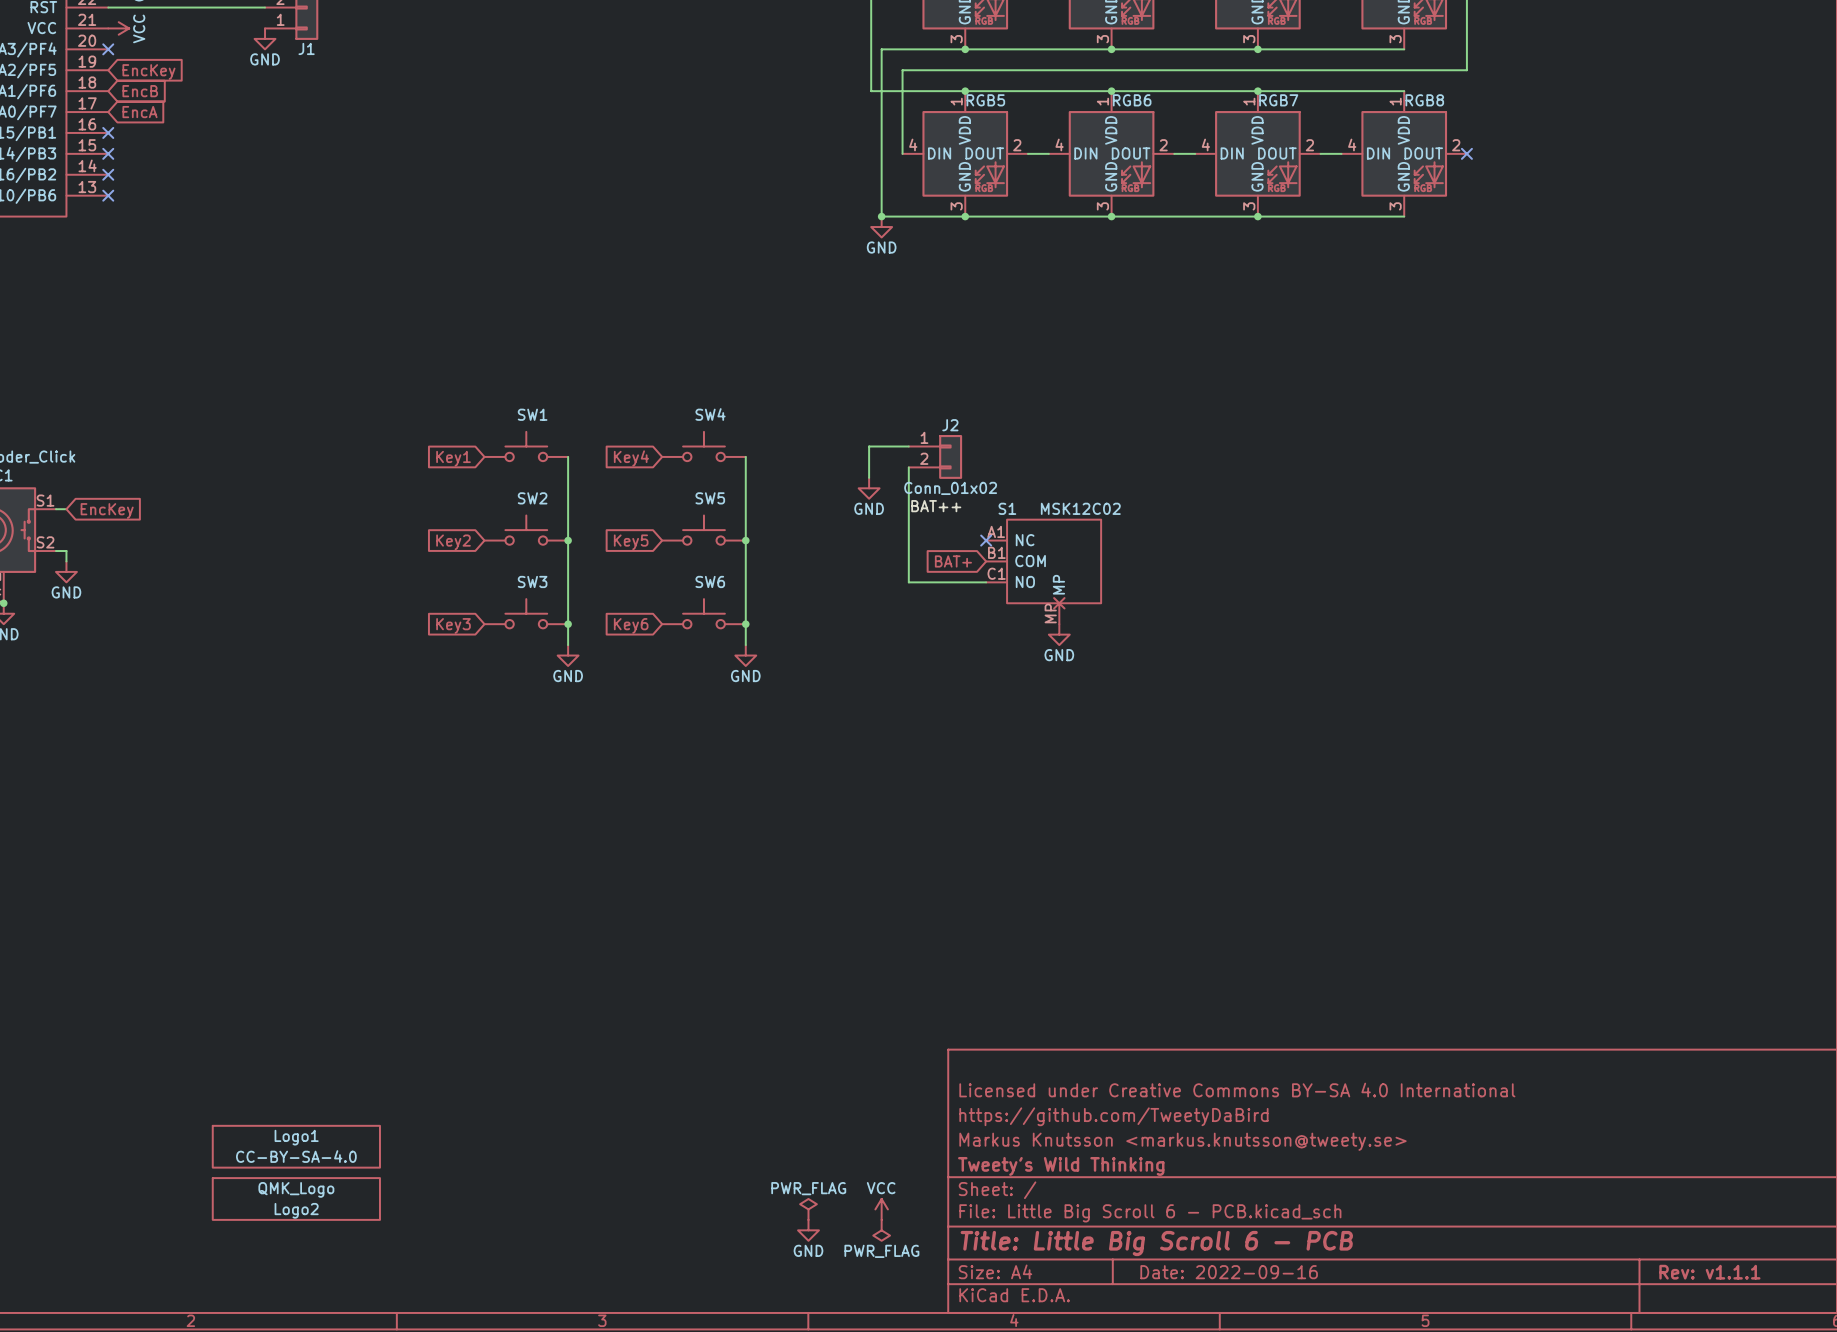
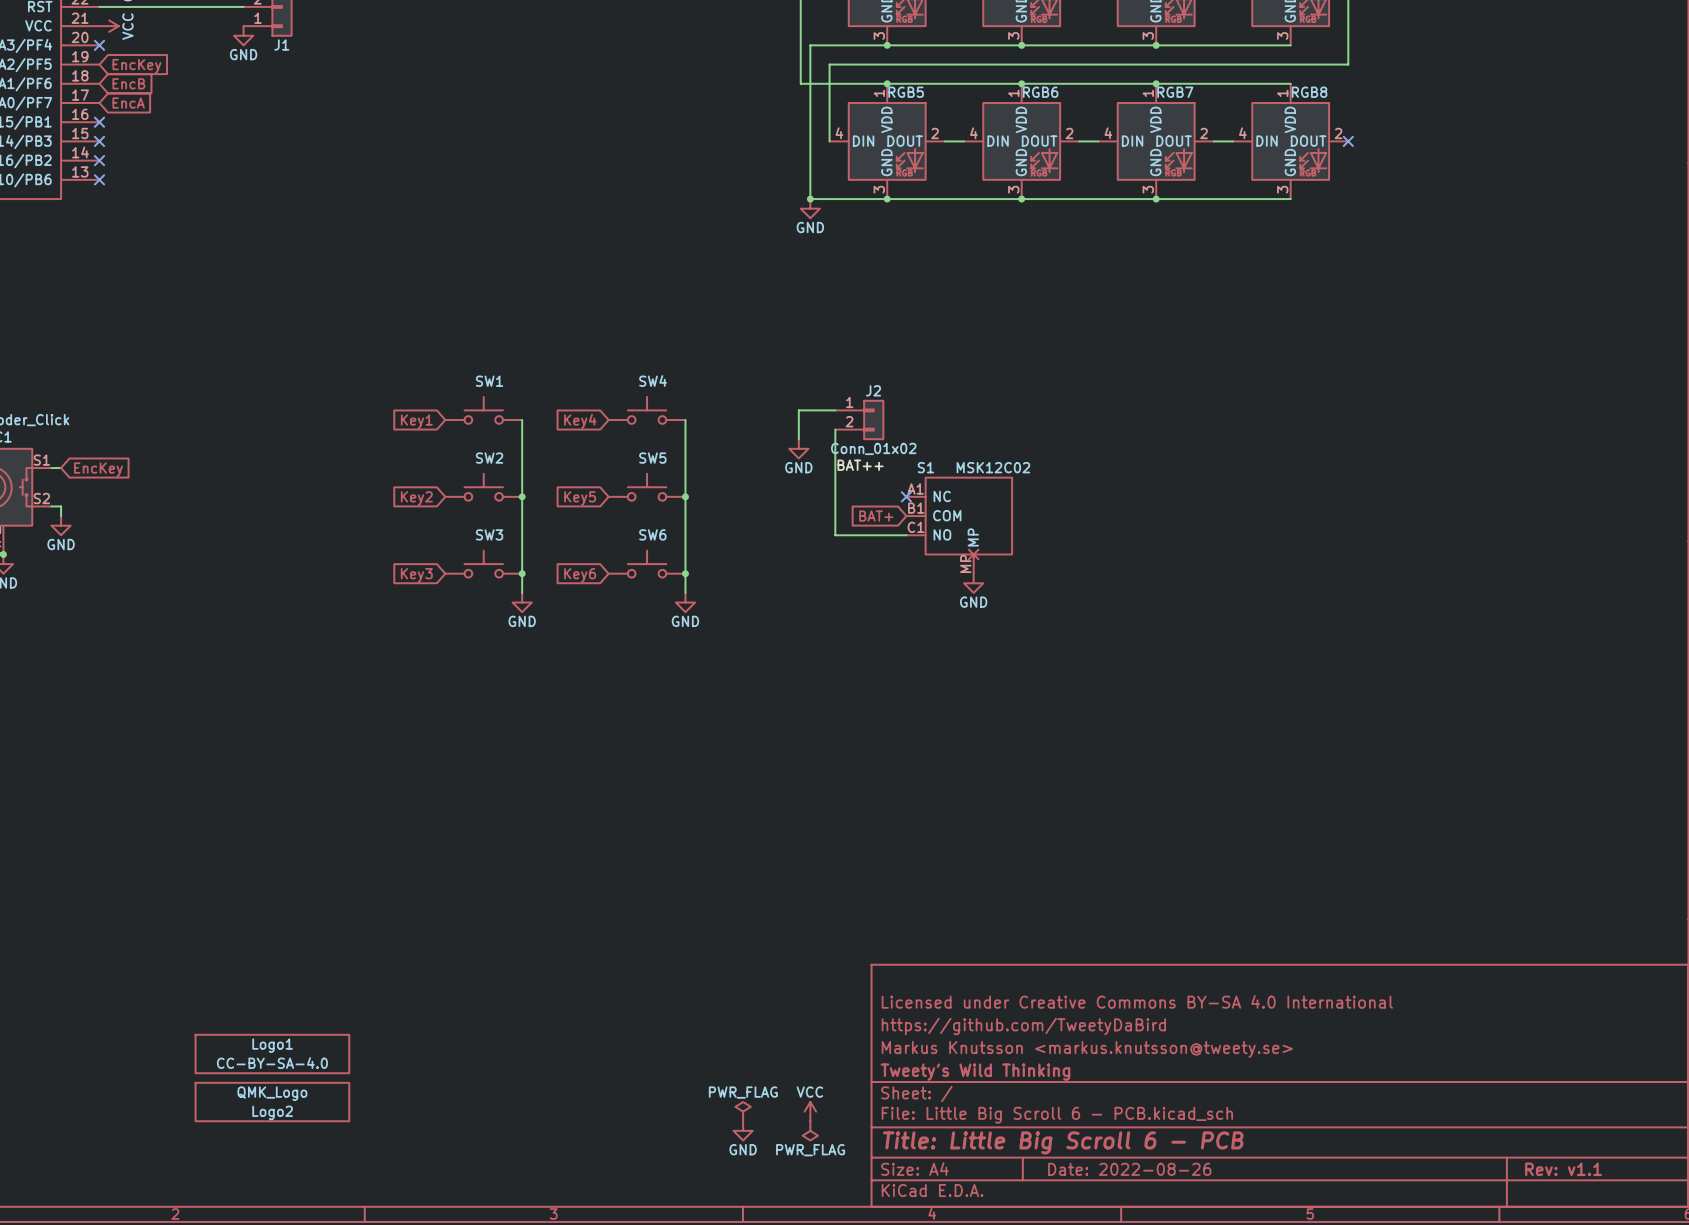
title block: Date: 2022-09-16 (1229, 1272) -> Date: 2022-08-26 (1129, 1169)
title block: Rev: v1.1.1 (1709, 1272) -> Rev: v1.1 (1563, 1169)

